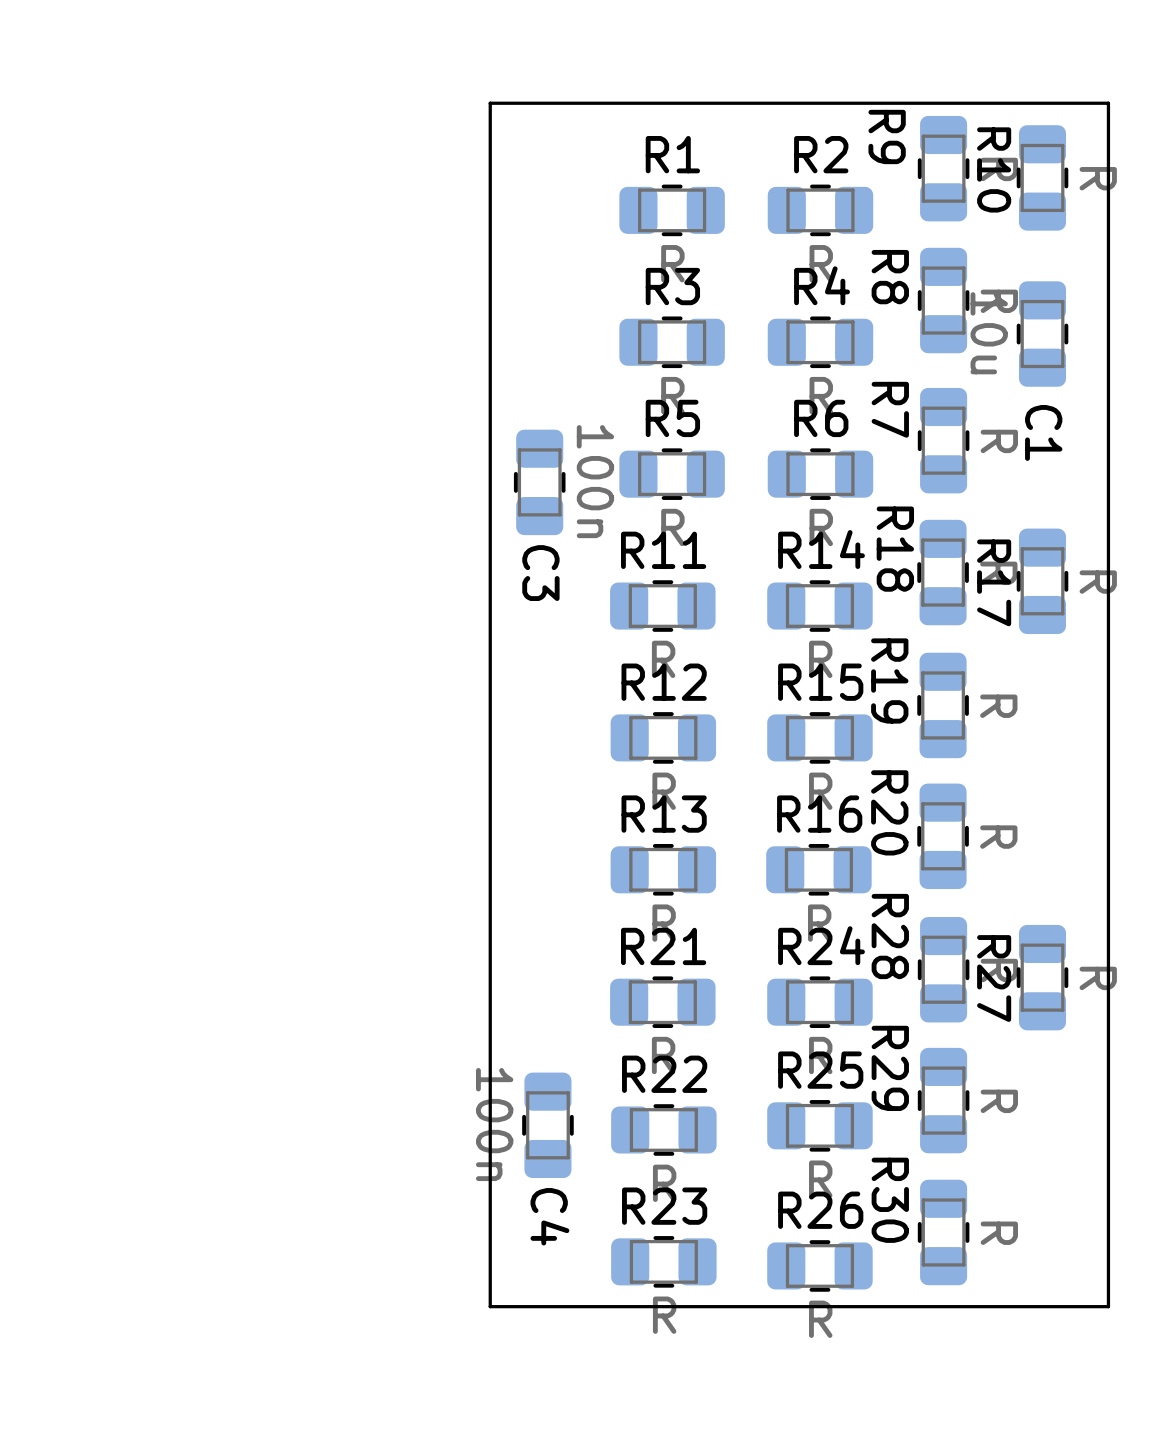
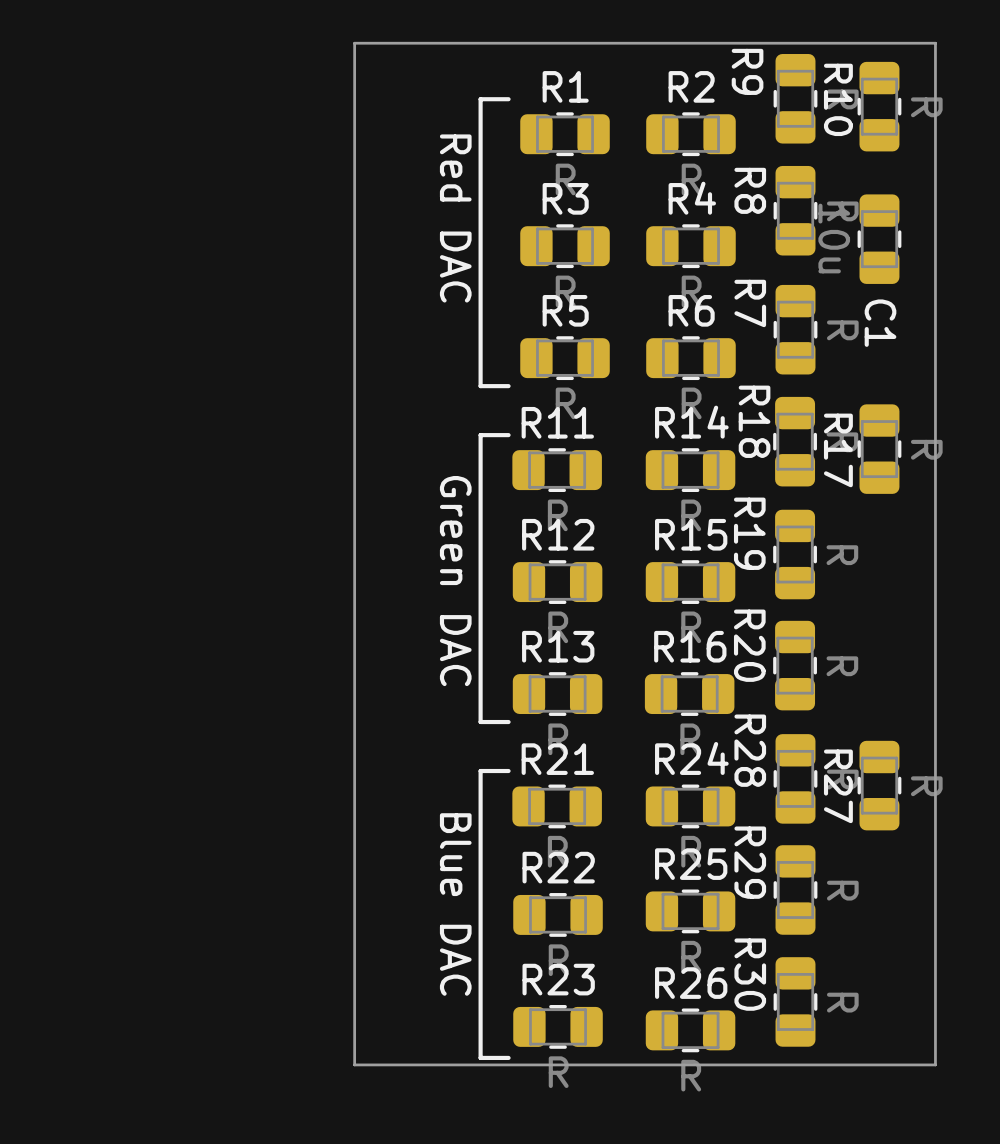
board edge: (490, 103) (490, 1306) -> (410, 43) (354, 43) (354, 1064) (410, 1064)
line: none -> (508, 99) (480, 99) (480, 386) (508, 386)
text: none -> Red DAC (455, 218)
C3: 100n (539, 482) -> none
line: none -> (508, 435) (480, 435) (480, 722) (508, 722)
text: none -> Green DAC (455, 581)
line: none -> (508, 771) (480, 771) (480, 1057) (508, 1057)
text: none -> Blue DAC (455, 904)
C4: 100n (547, 1125) -> none

